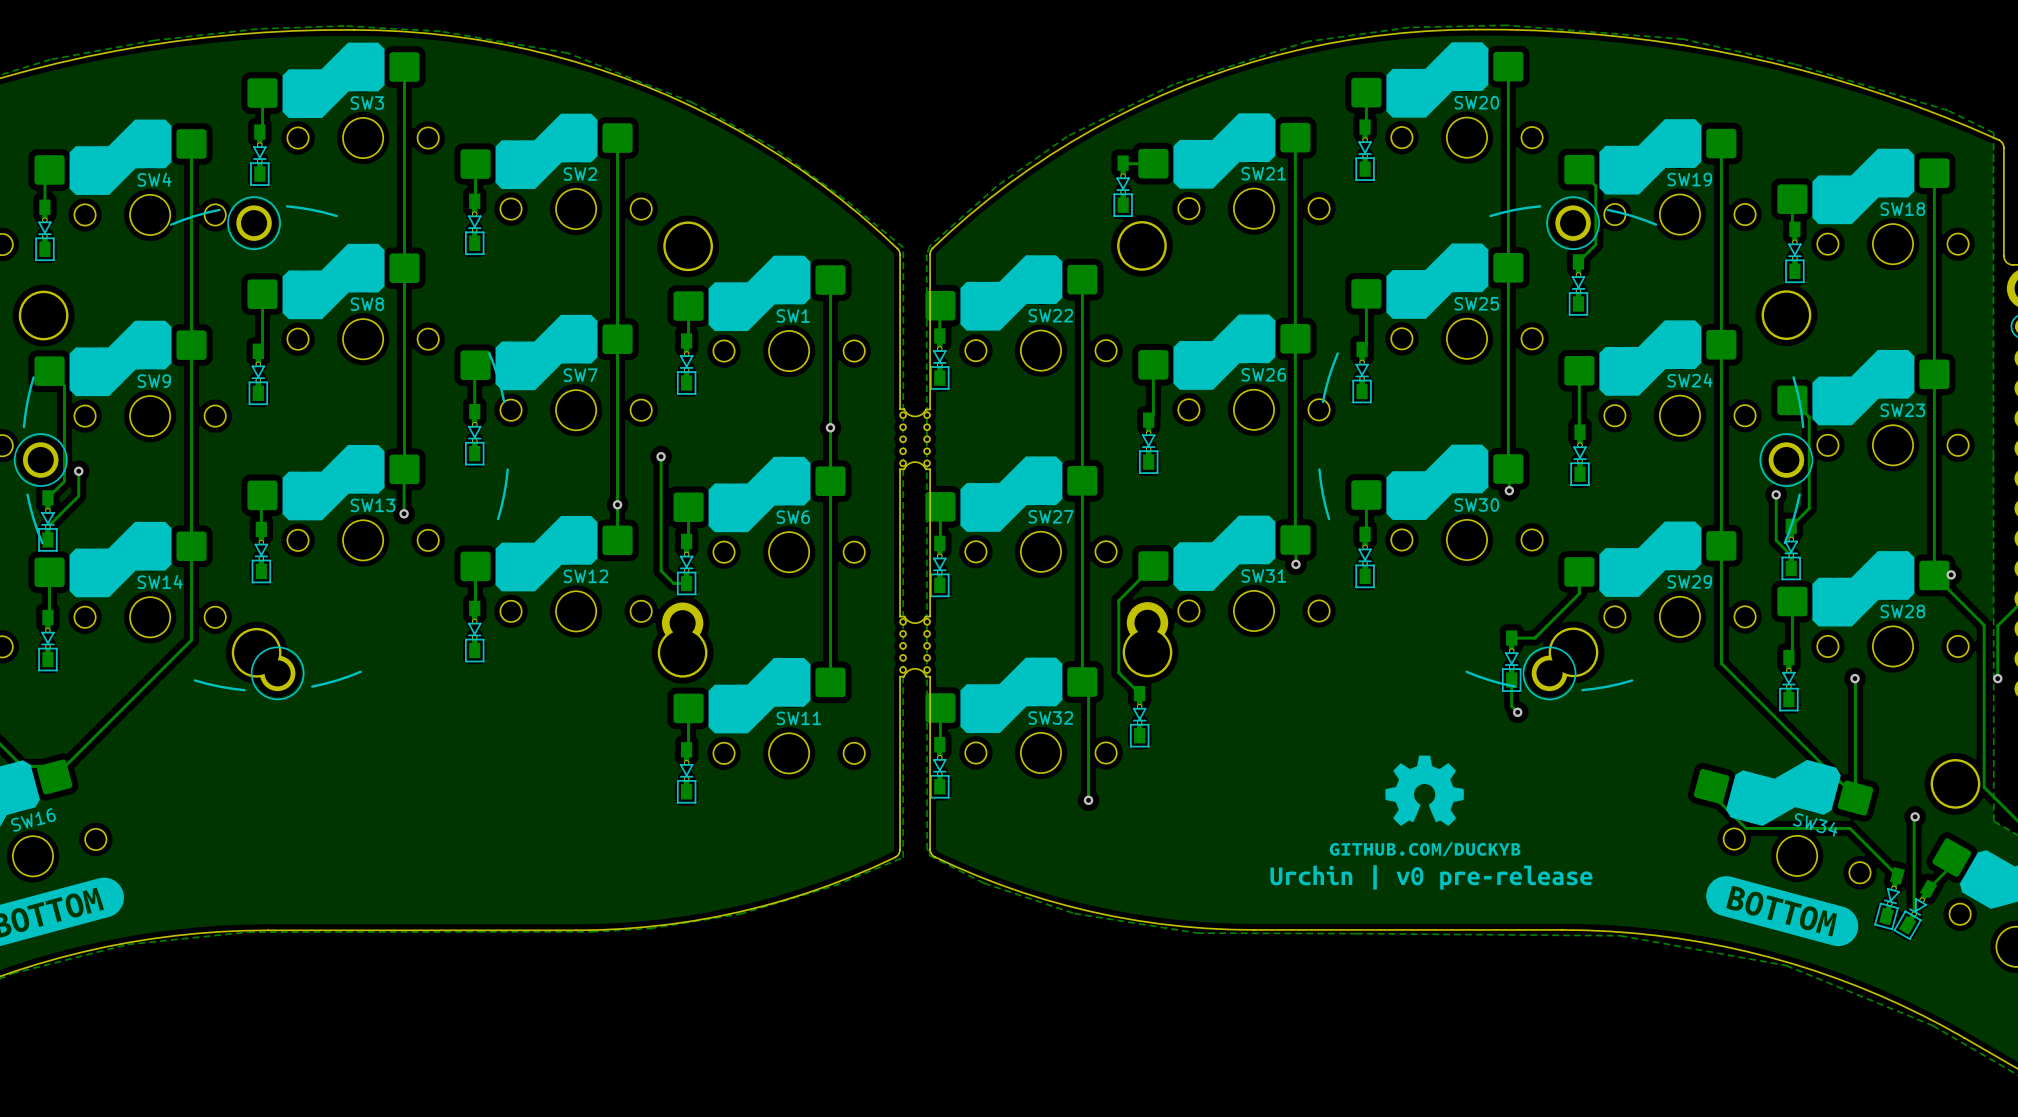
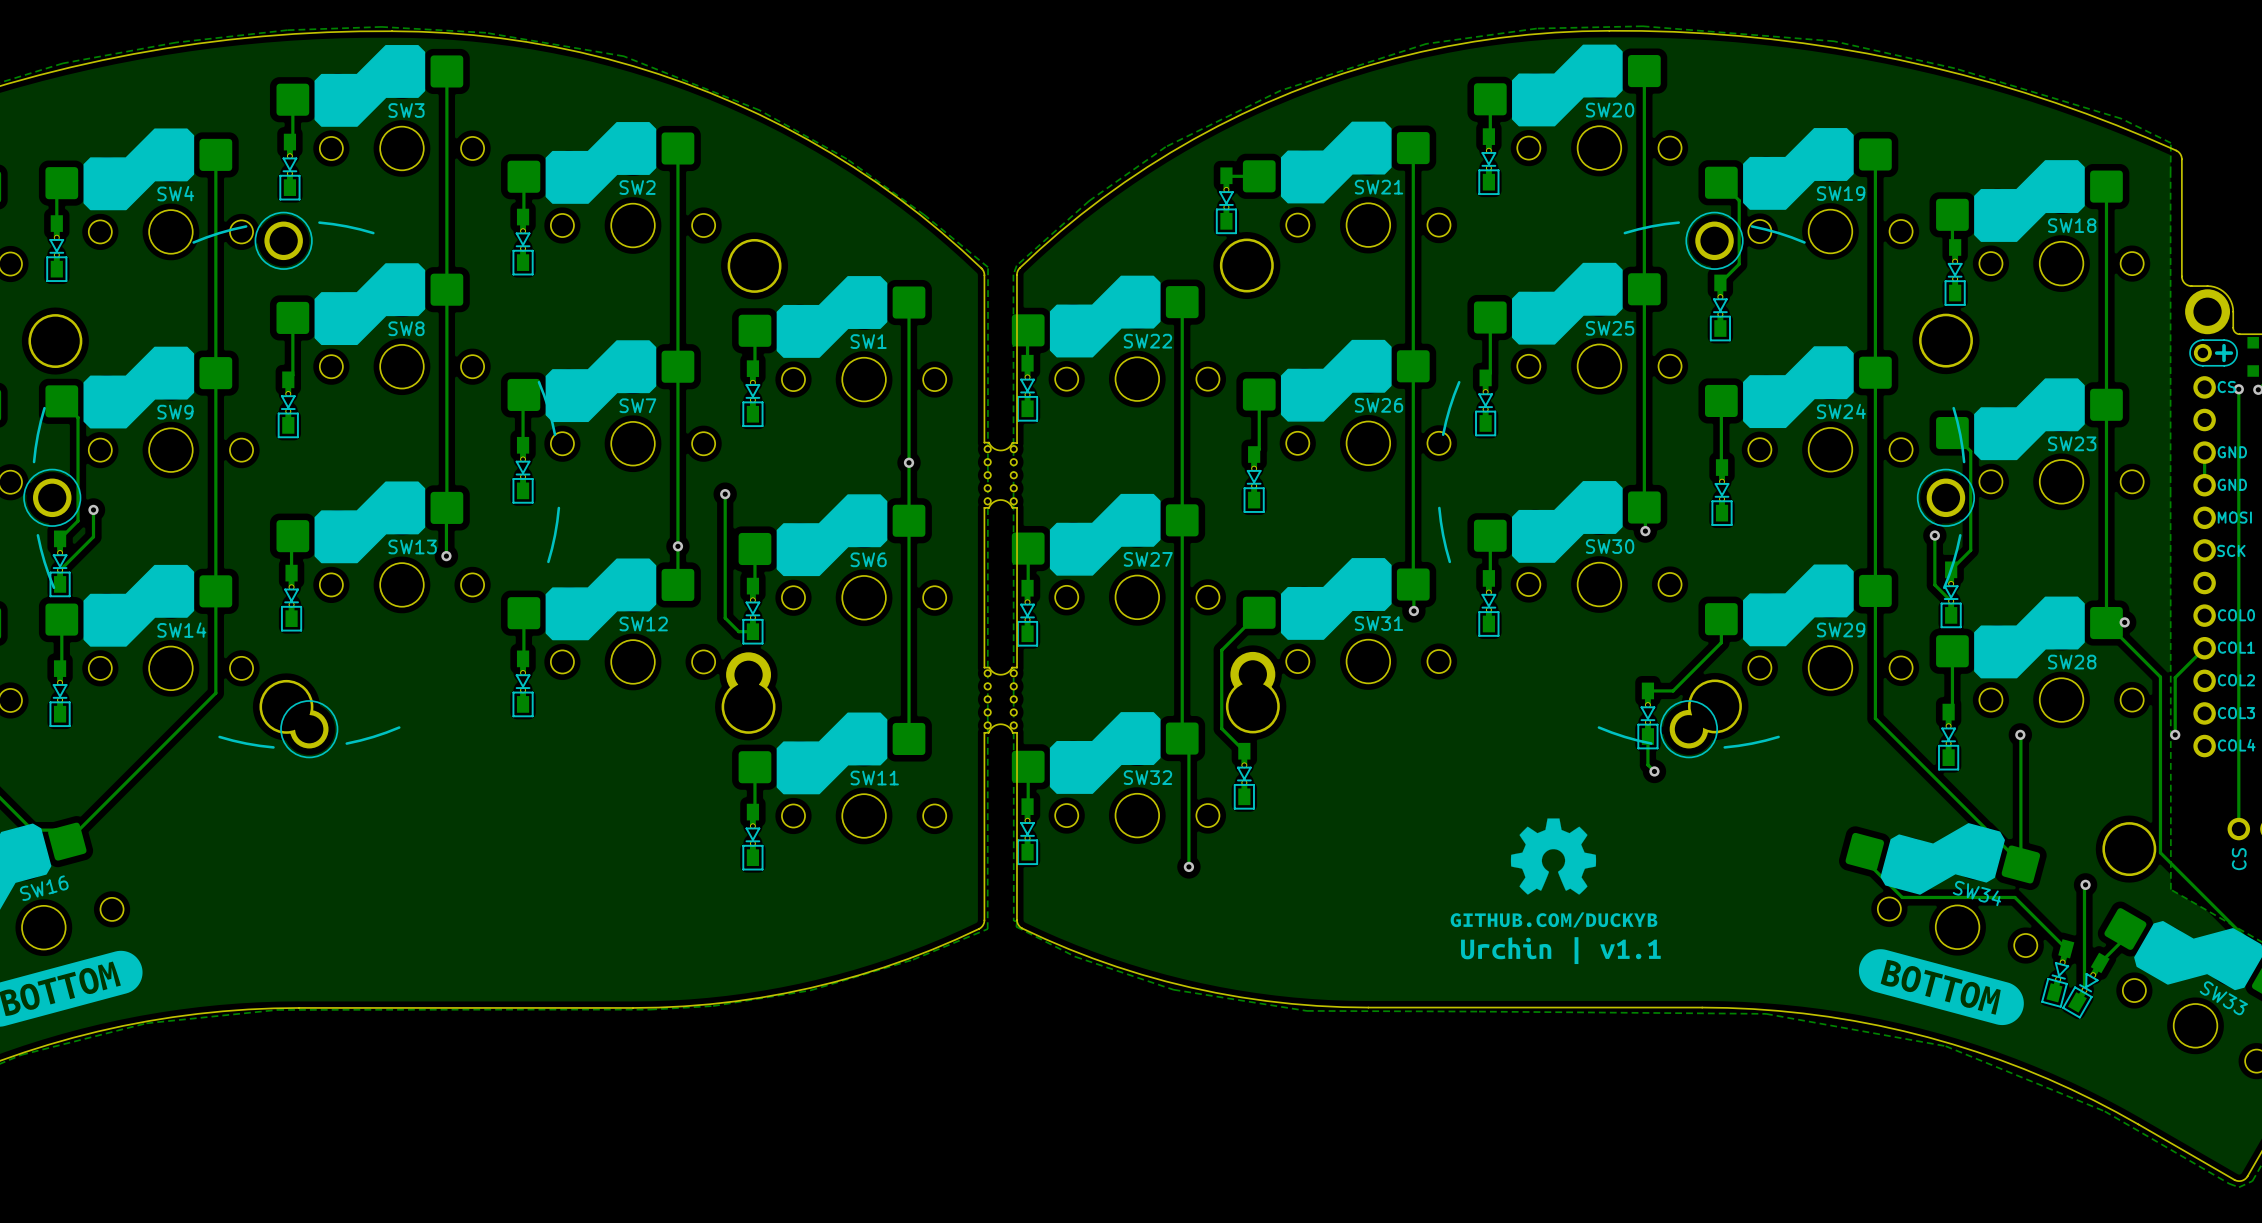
drawing shape: [1270, 865, 1593, 890] -> [1461, 937, 1661, 965]

